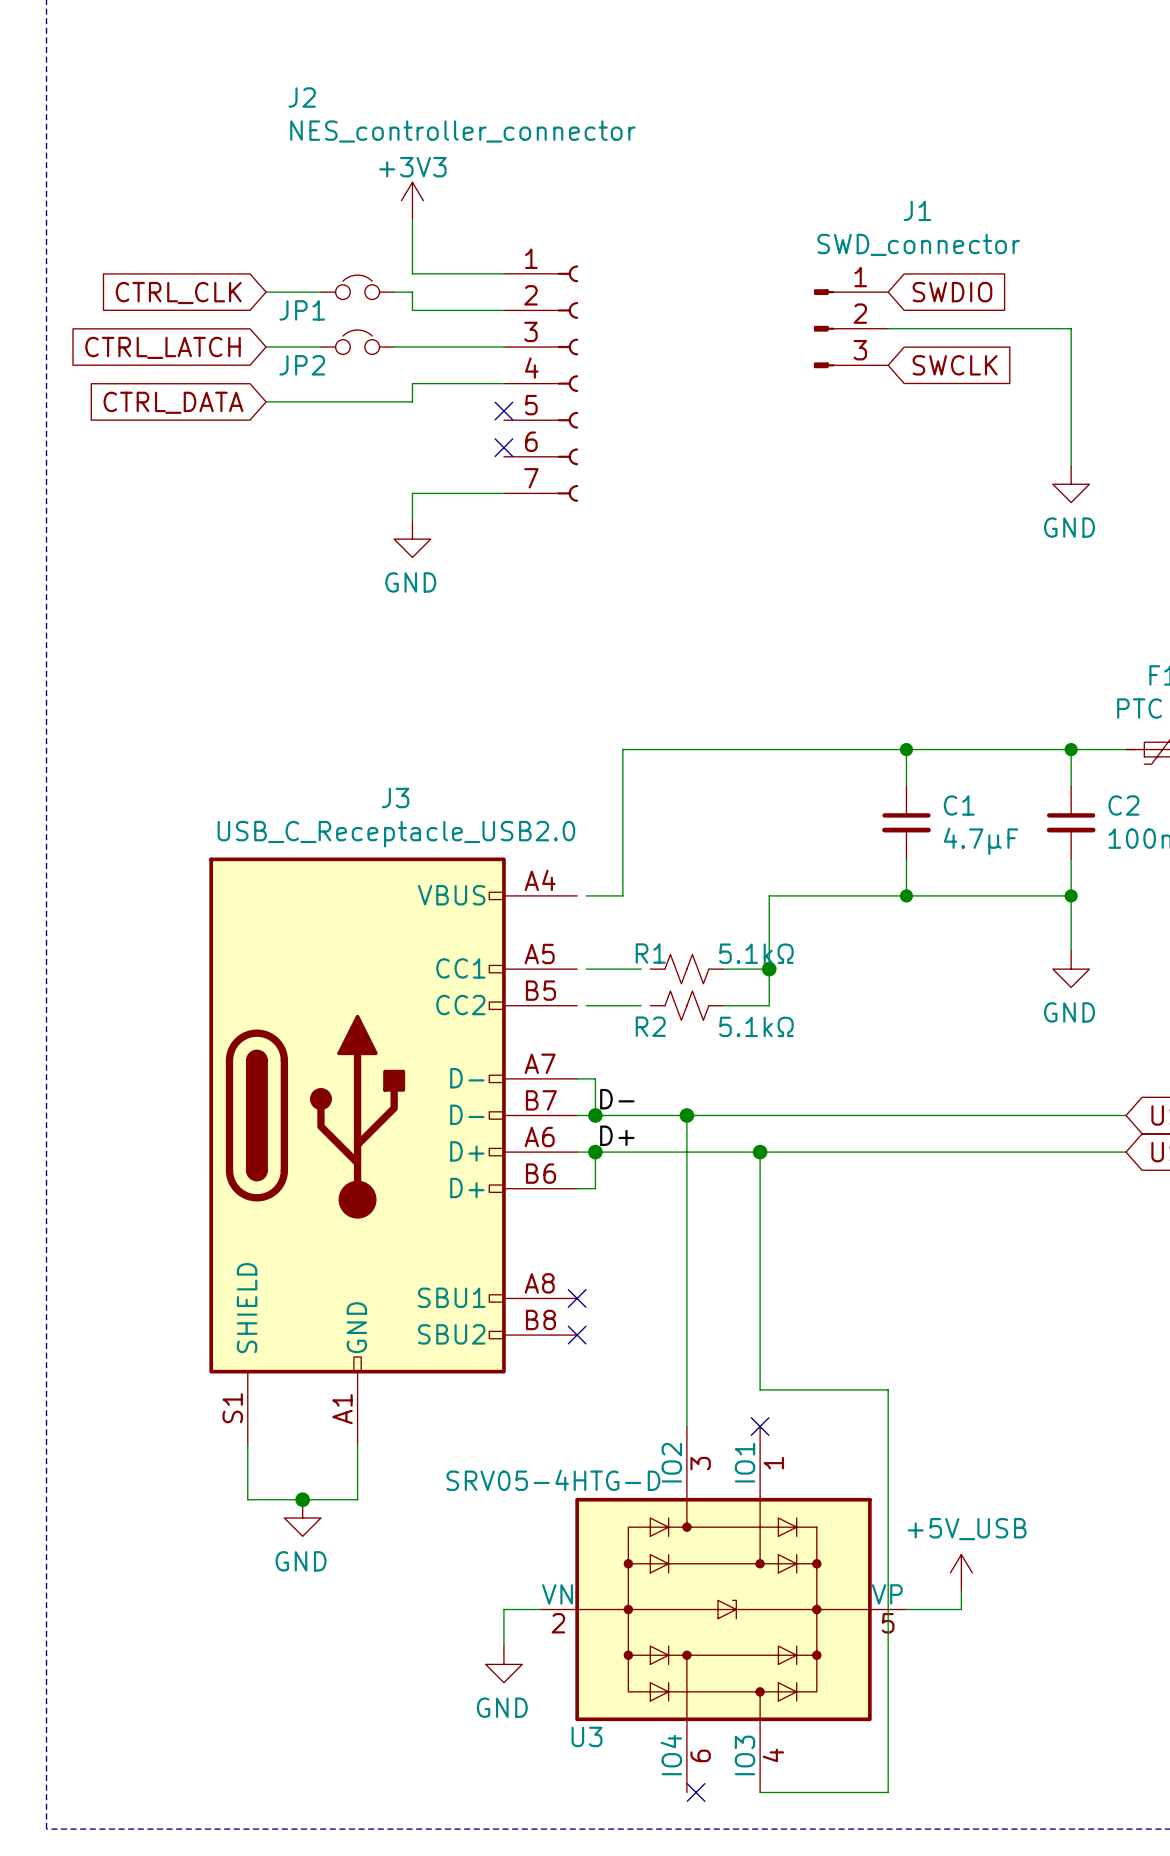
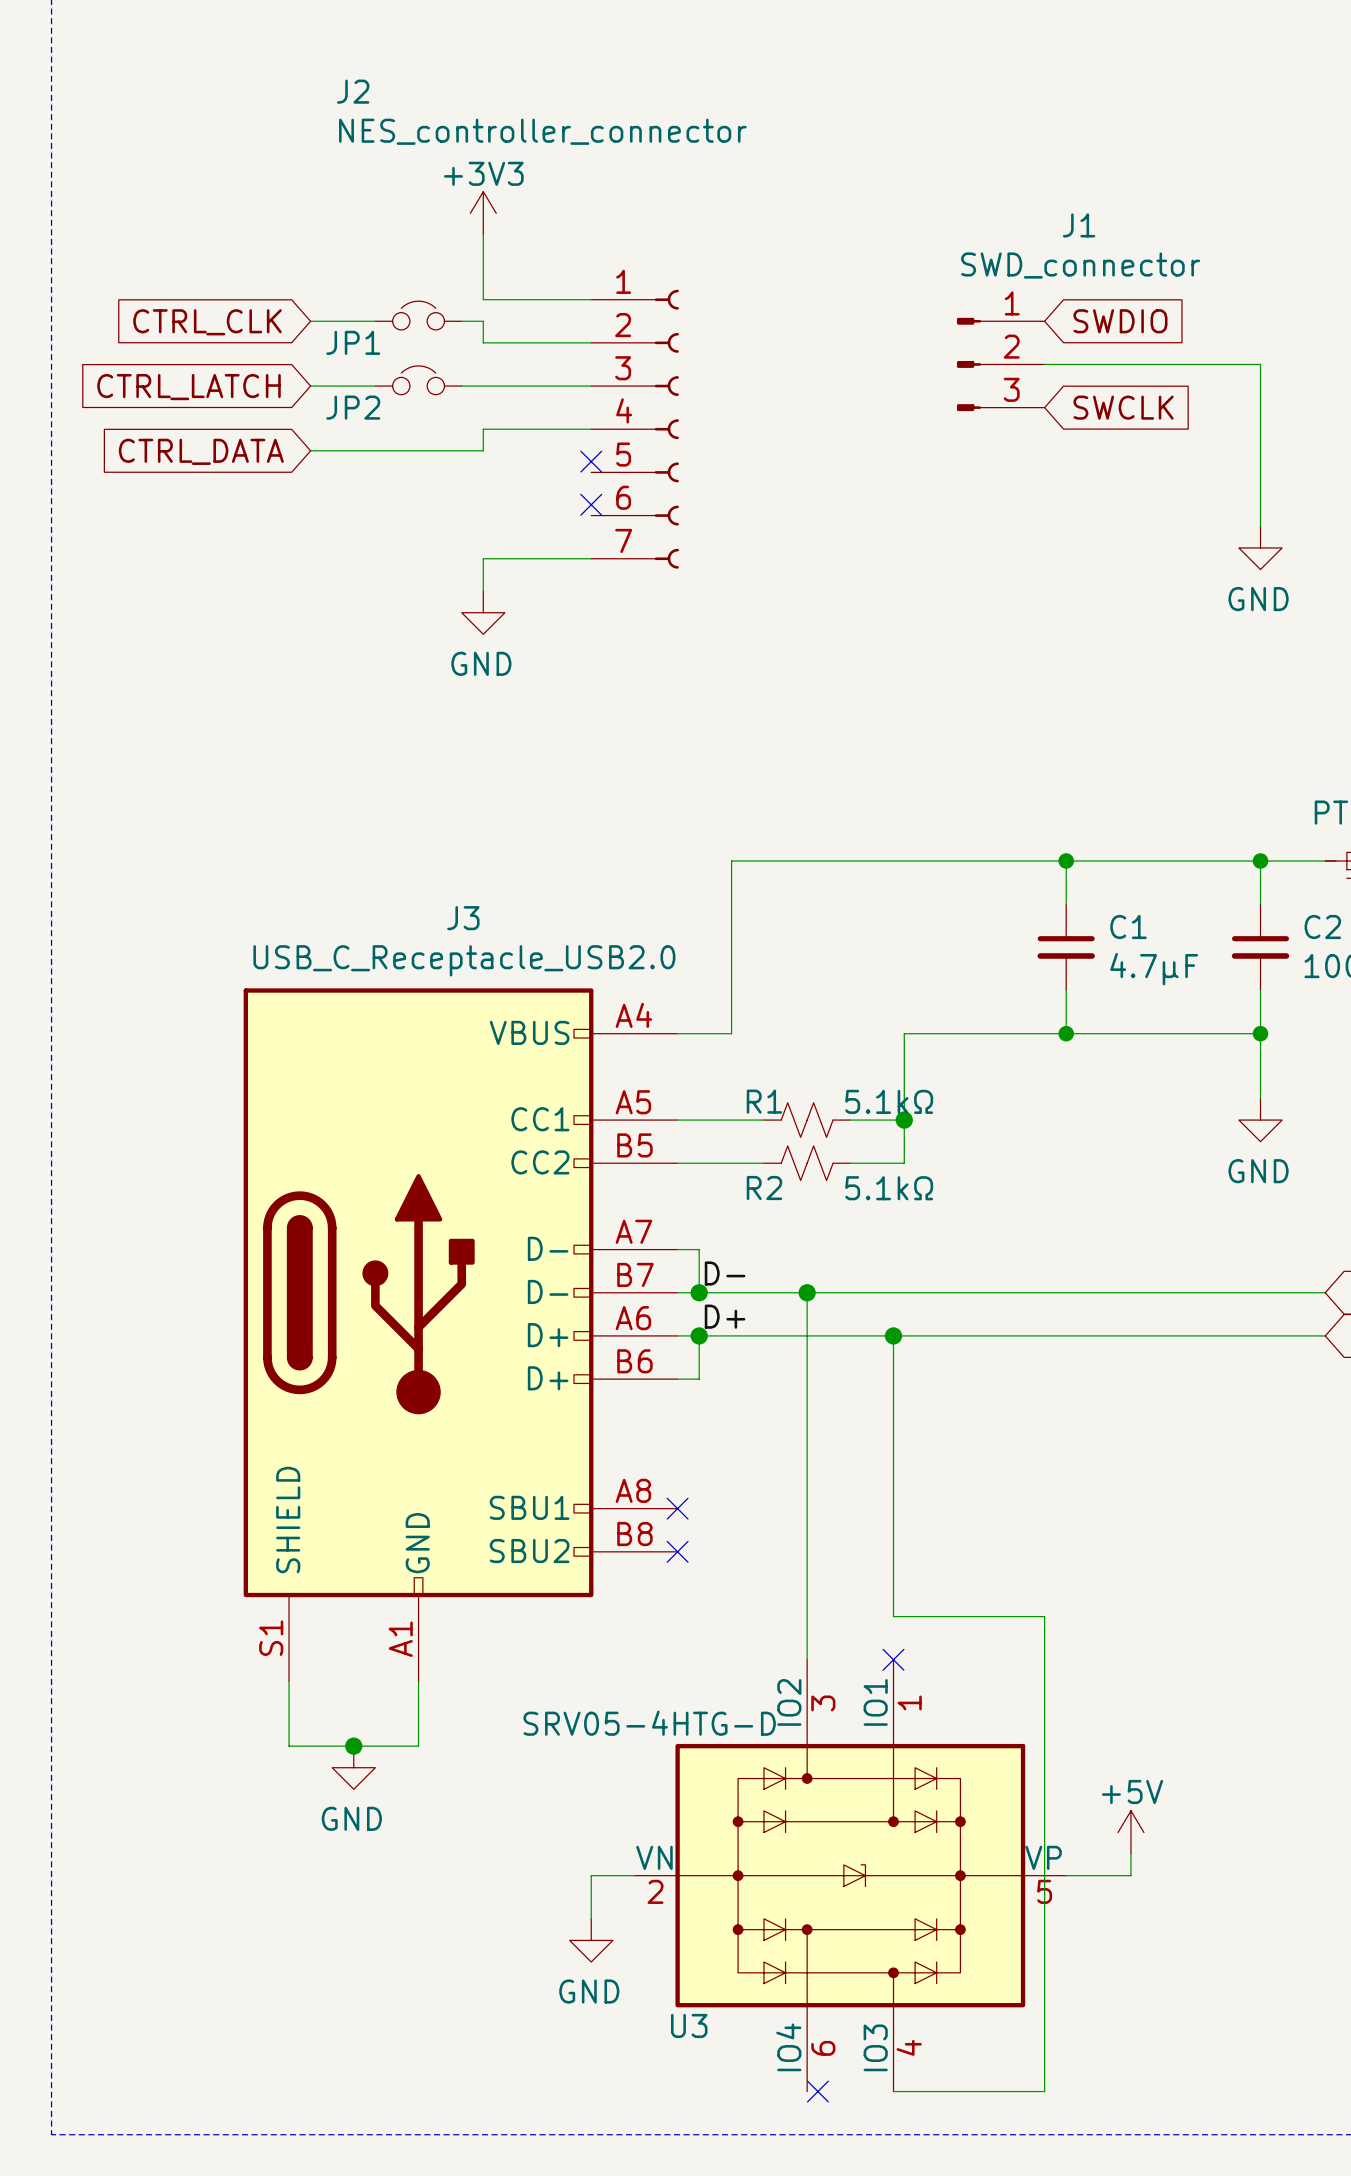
wire: none -> (677, 1033) (688, 1033)
wire: none -> (677, 1120) (688, 1120)
wire: none -> (753, 1120) (763, 1120)
wire: none -> (677, 1163) (688, 1163)
wire: none -> (753, 1163) (763, 1163)
power symbol: +5V_USB (961, 1572) -> +5V (1130, 1832)

